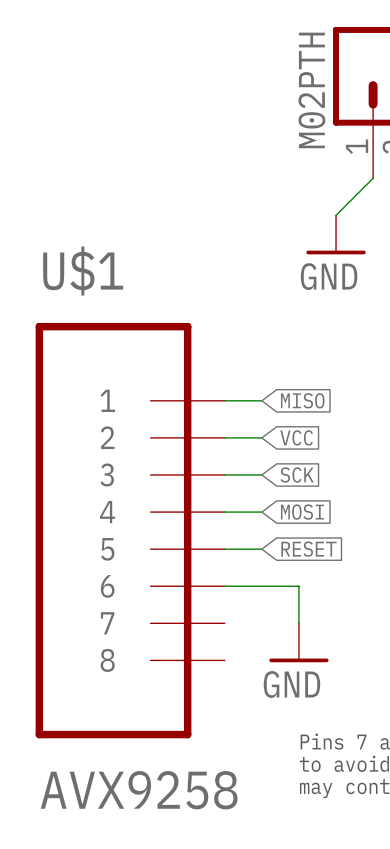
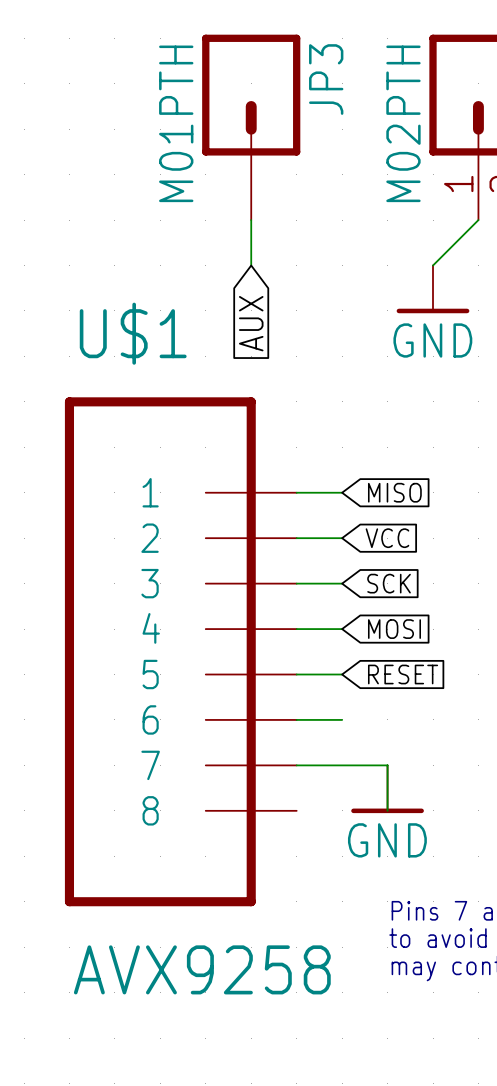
JP3: none -> M01PTH (251, 127)
wire: none -> (251, 220) (251, 265)
global label: none -> AUX (251, 323)
wire: (261, 586) (298, 586) (298, 623) -> none
wire: none -> (296, 765) (387, 765) (387, 810)

